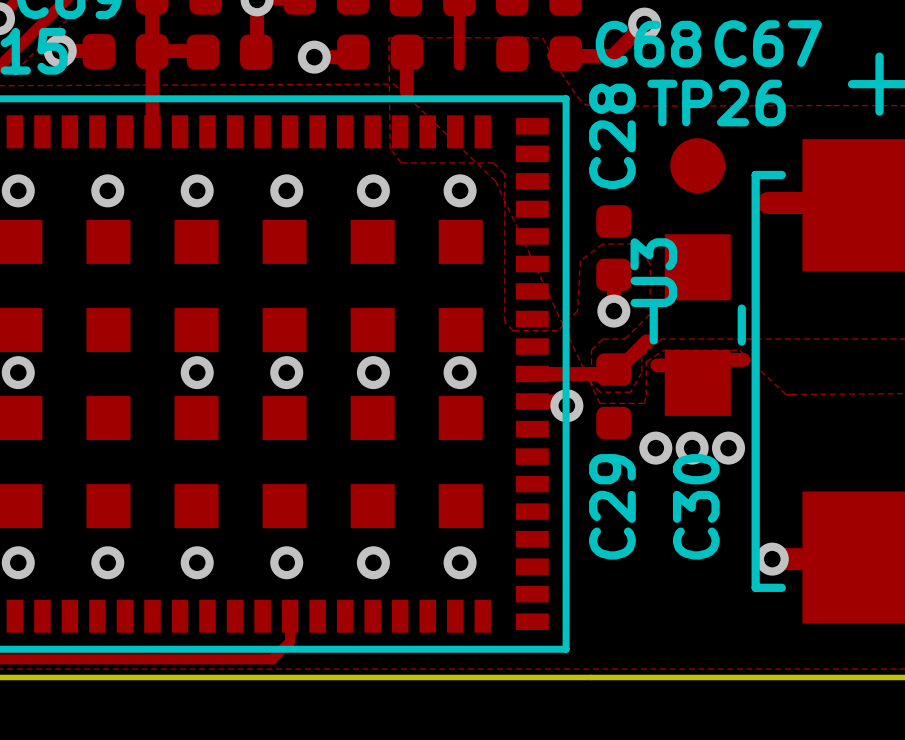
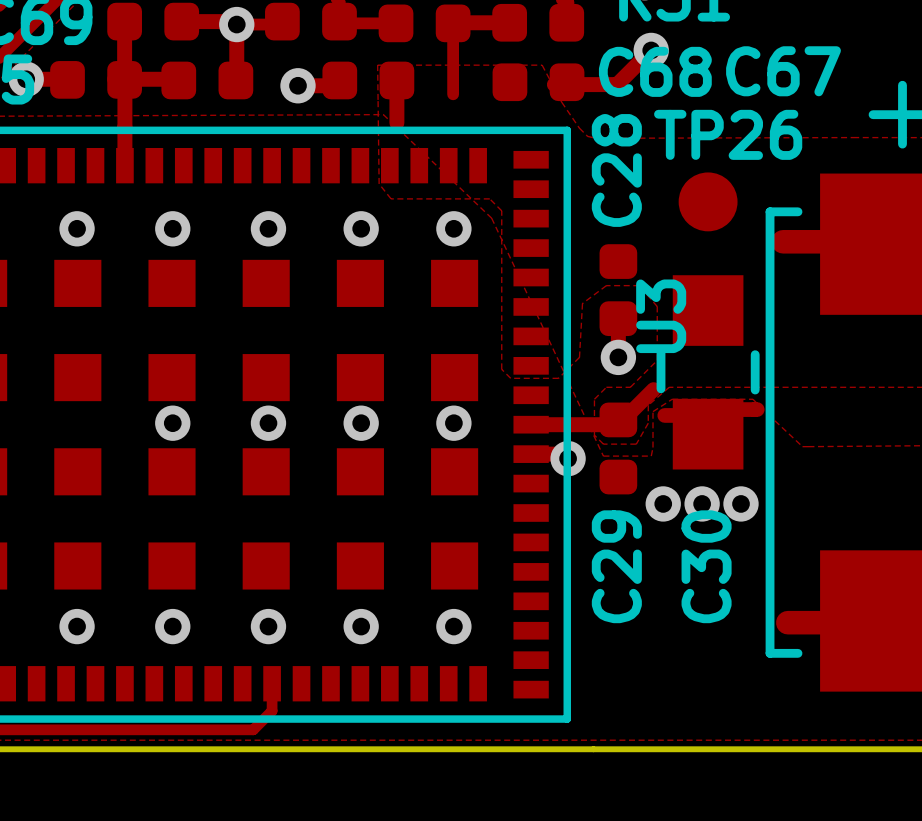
via: (772, 559) -> none

